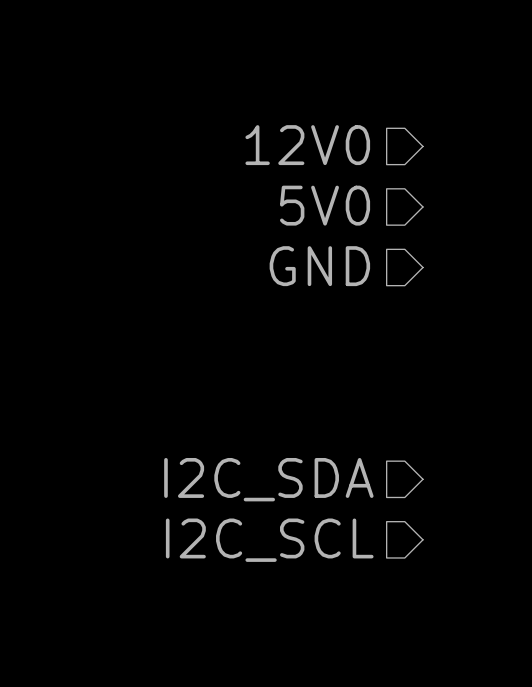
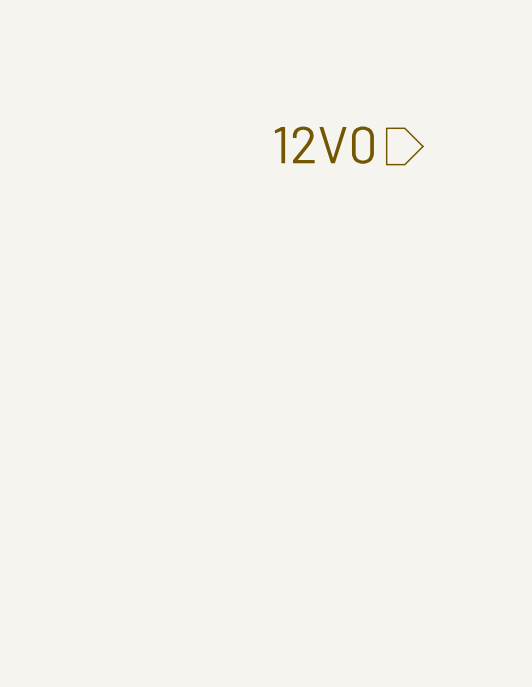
hierarchical label: 5V0 (325, 205) -> none
hierarchical label: GND (319, 266) -> none
hierarchical label: I2C_SDA (268, 479) -> none
hierarchical label: I2C_SCL (269, 540) -> none

